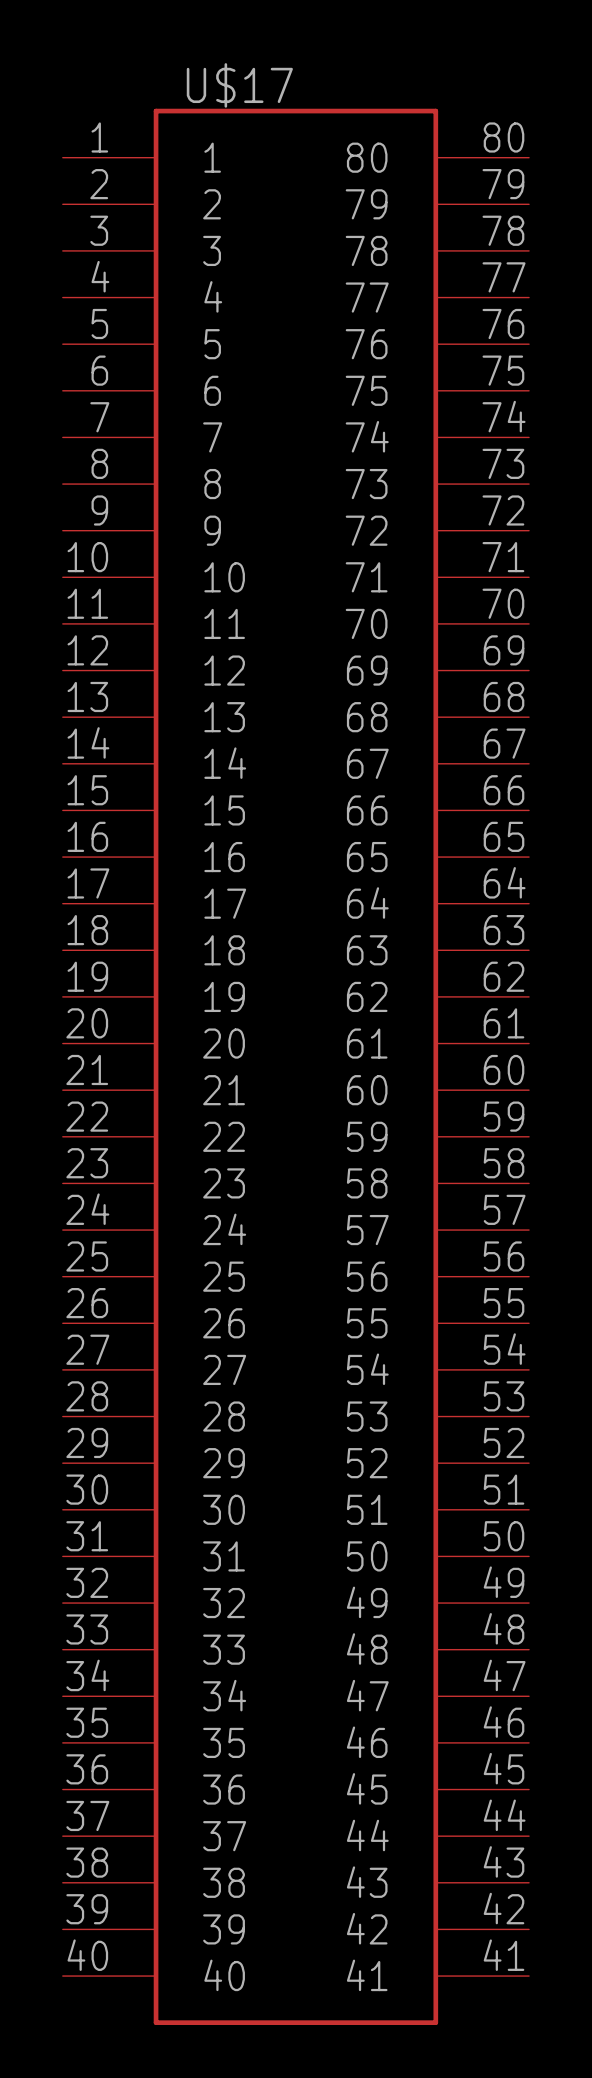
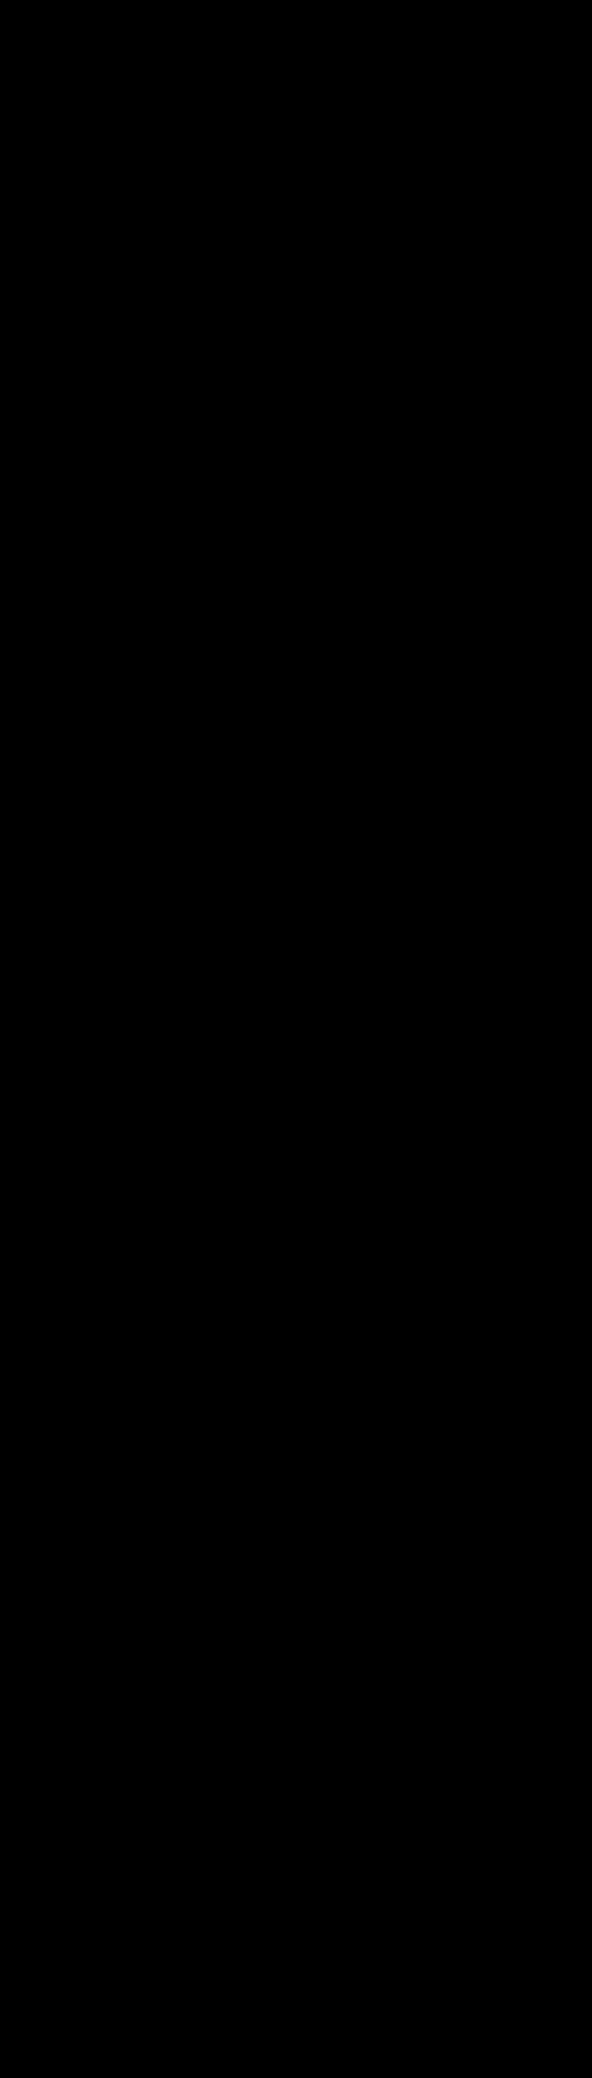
U$17: (295, 1066) -> none

